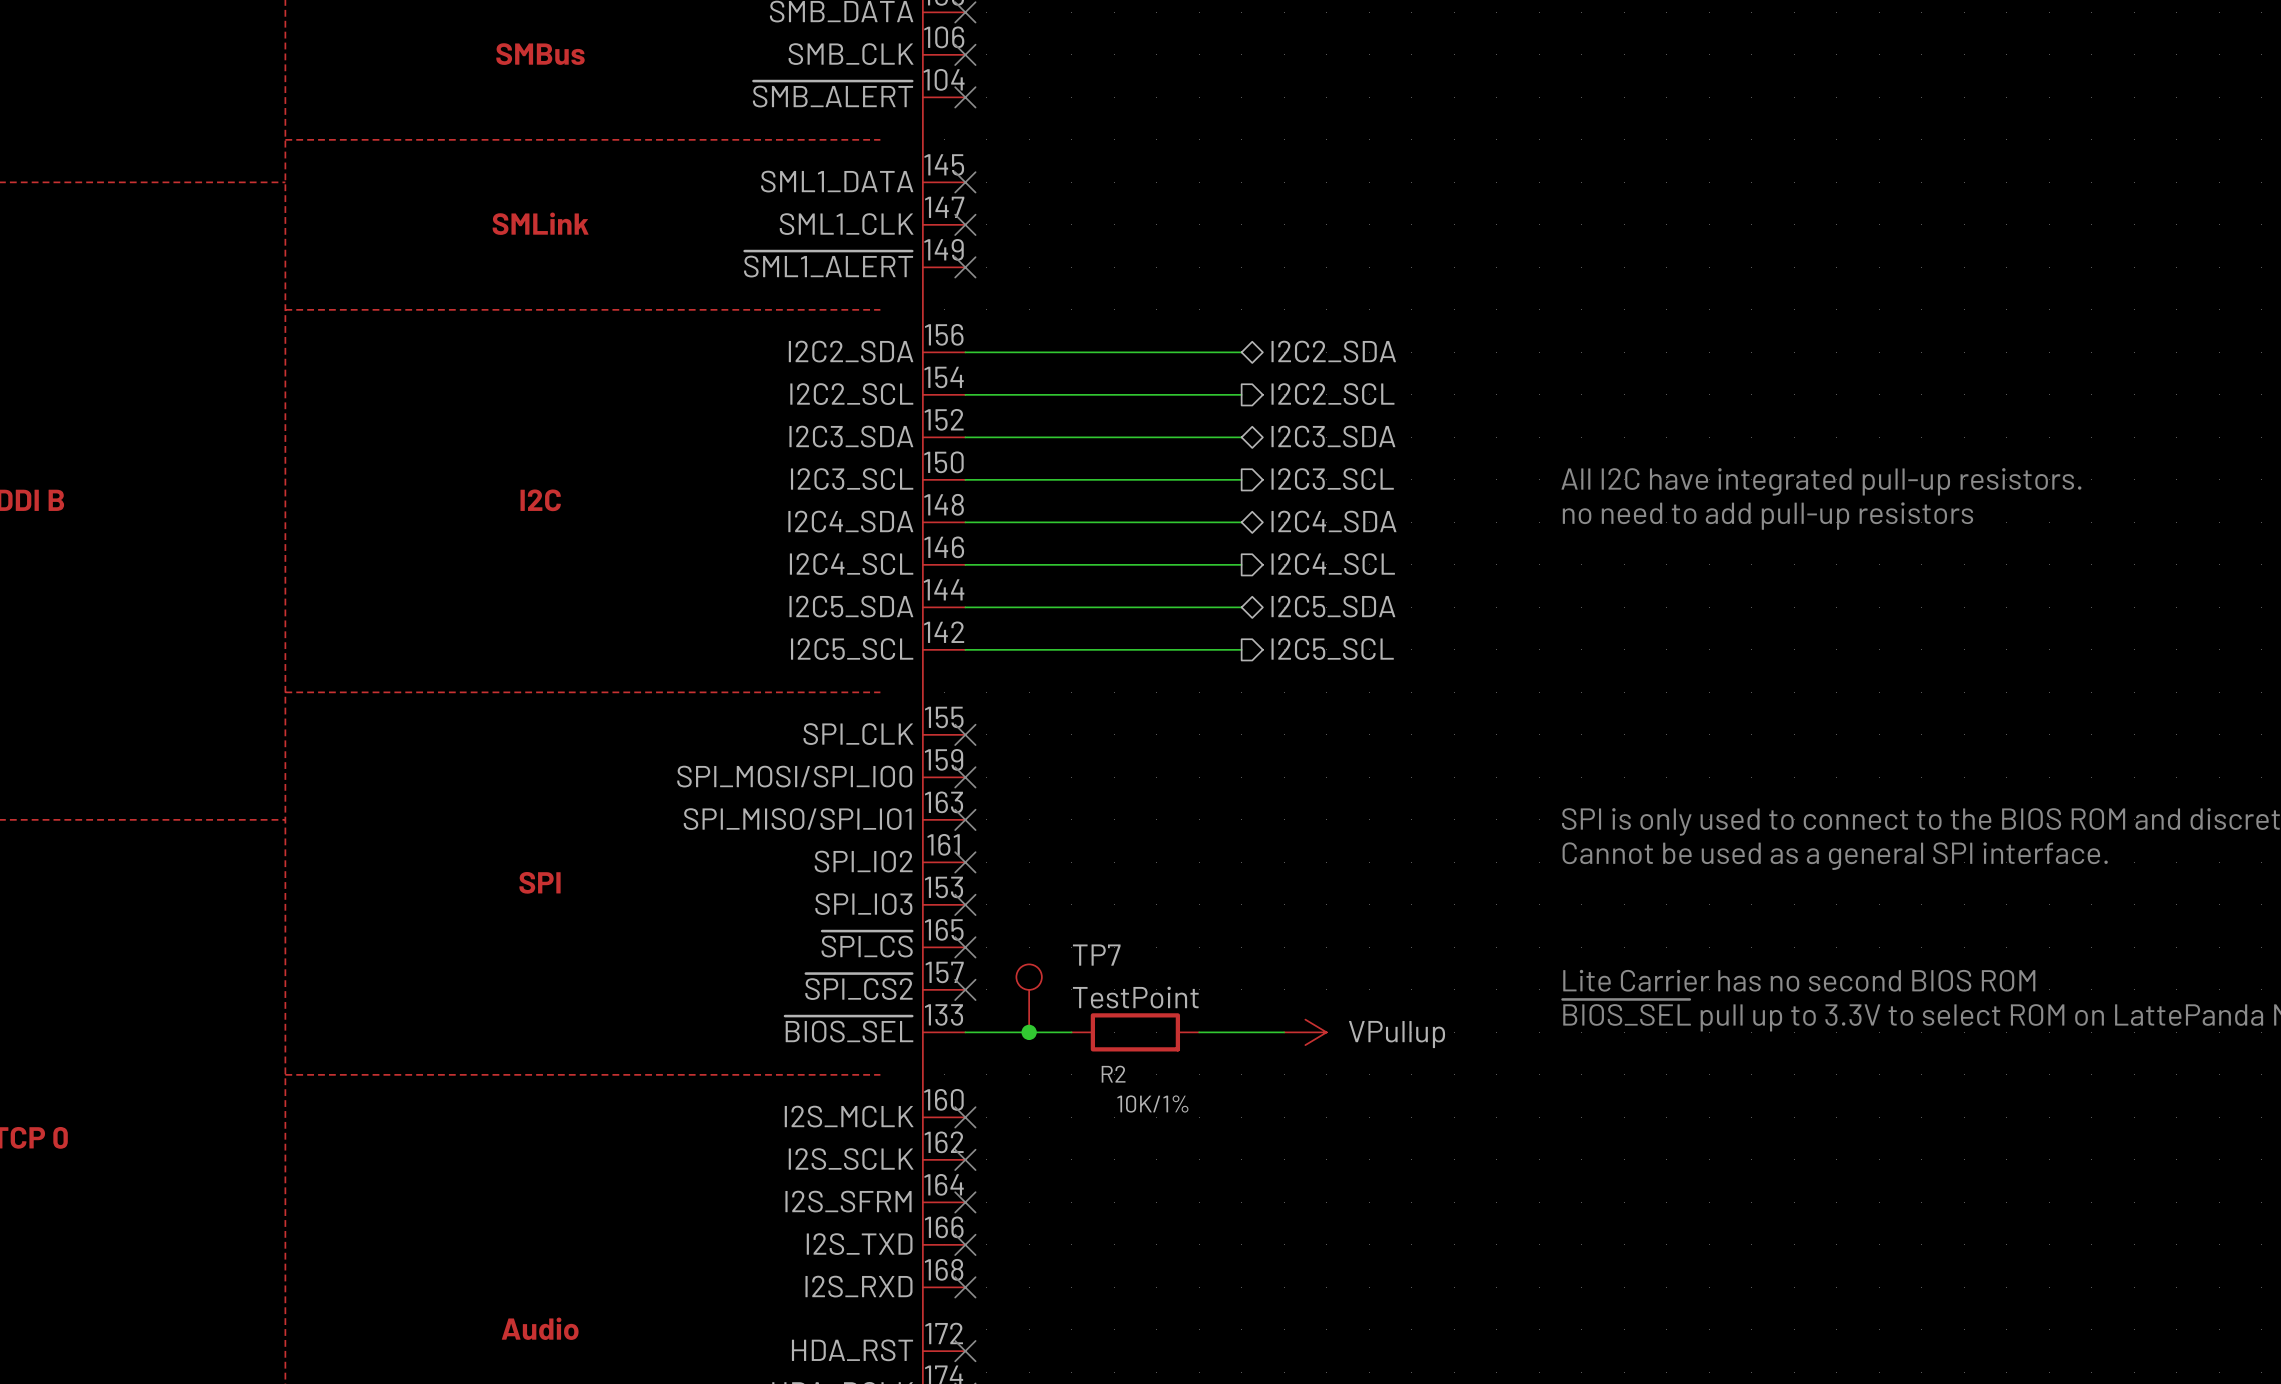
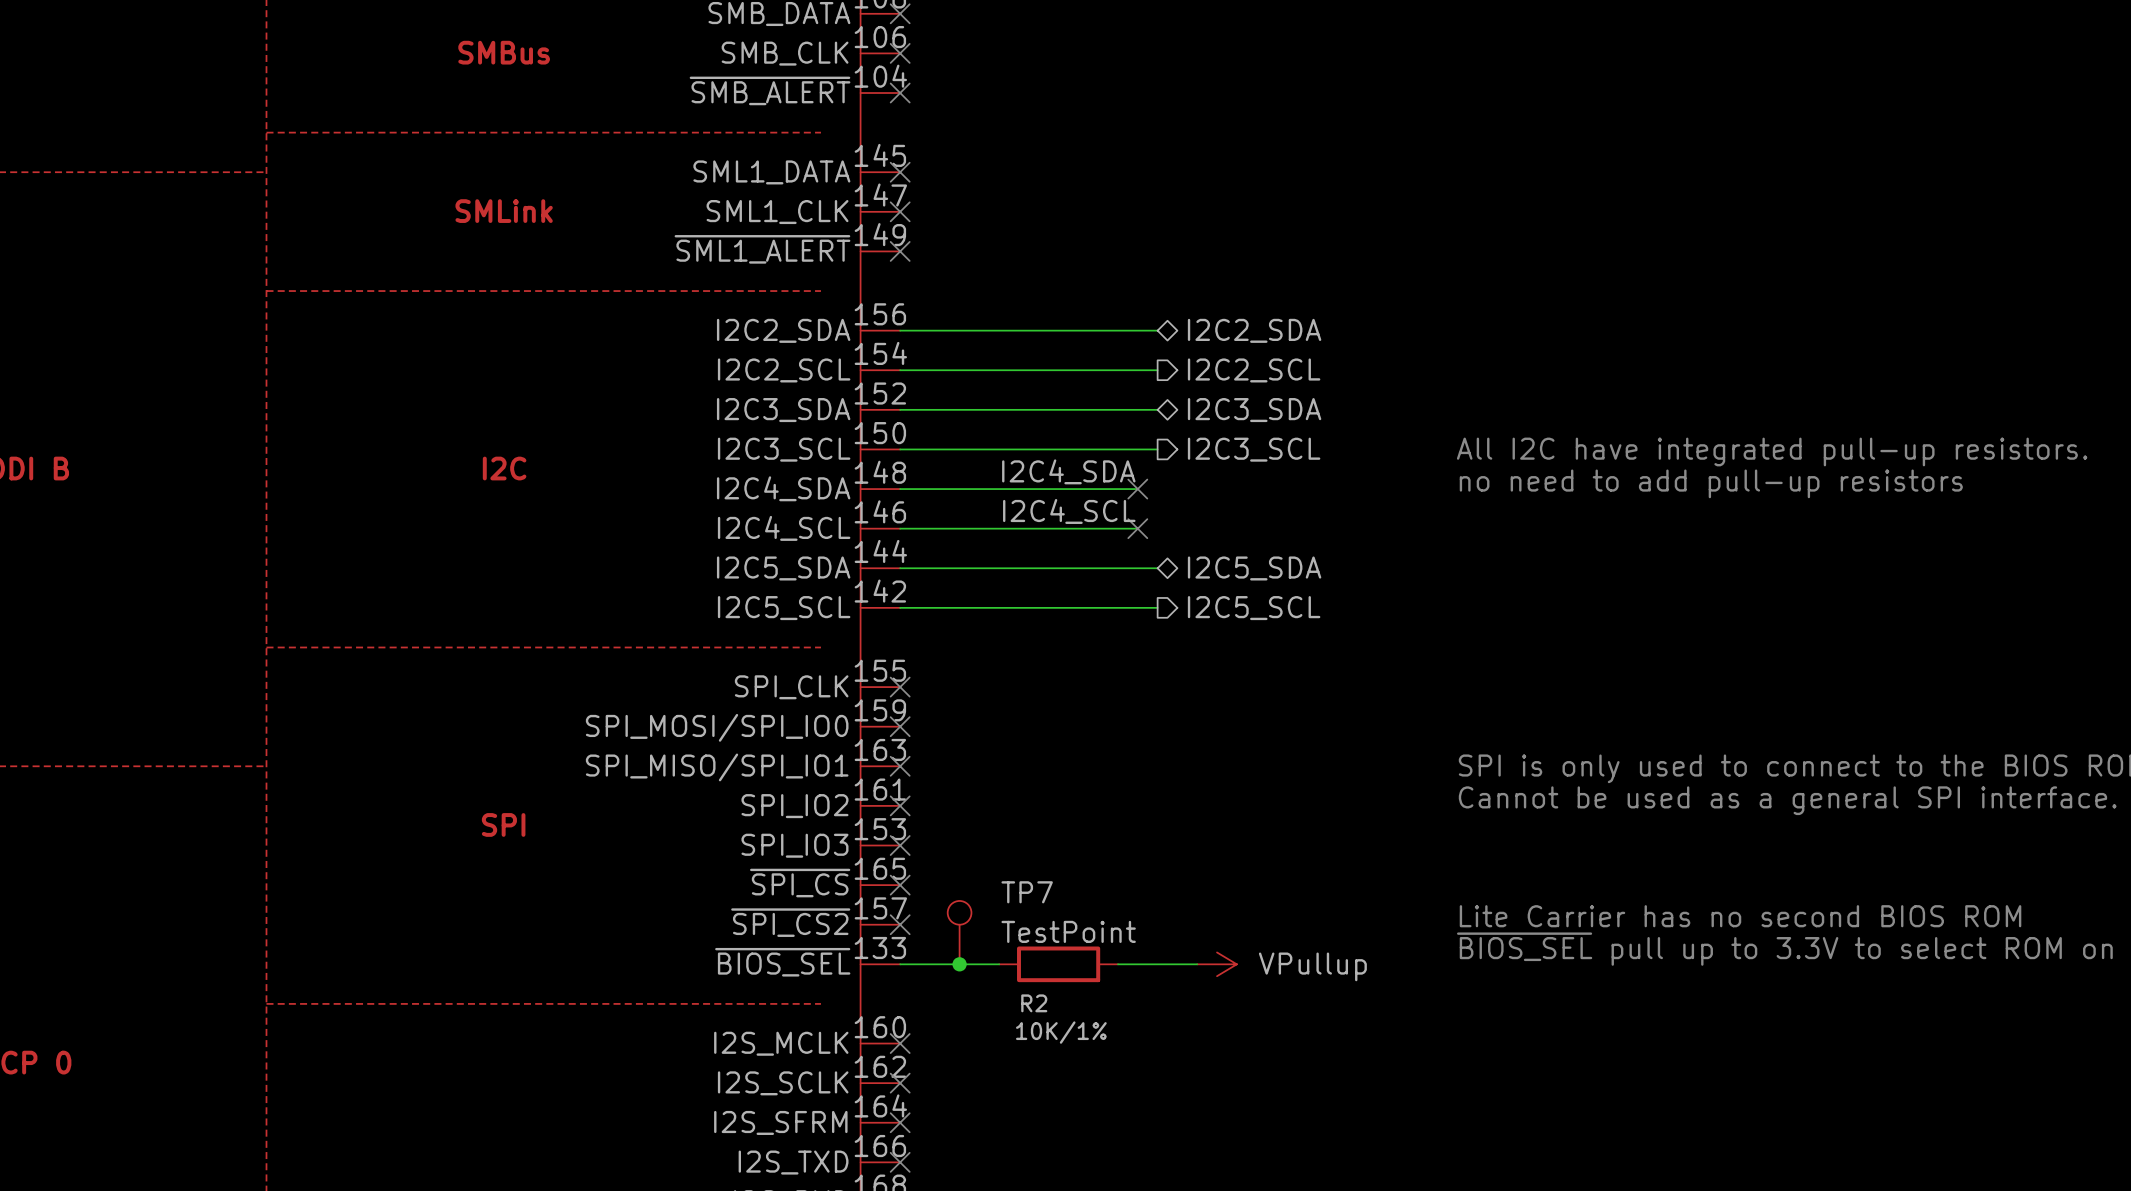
label: none -> I2C4_SDA (1068, 471)
hierarchical label: I2C4_SDA (1333, 521) -> none
wire: (1220, 522) (1241, 522) -> none
no-connect mark: none -> (1137, 489)
label: none -> I2C4_SCL (1069, 511)
wire: (1220, 564) (1241, 564) -> none
no-connect mark: none -> (1137, 528)
hierarchical label: I2C4_SCL (1333, 564) -> none

